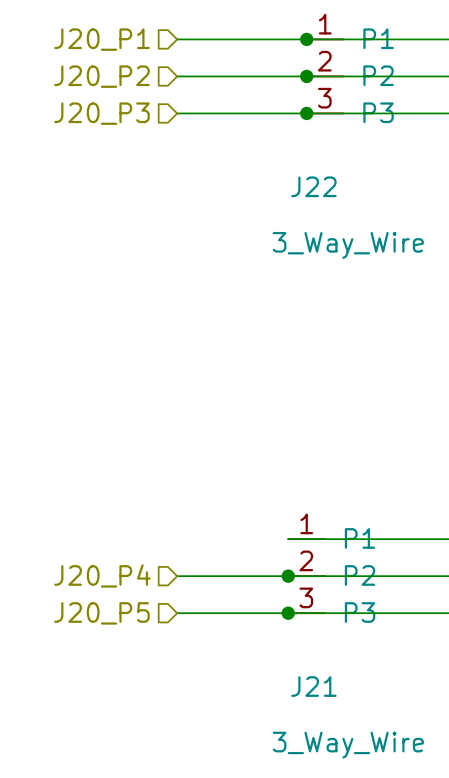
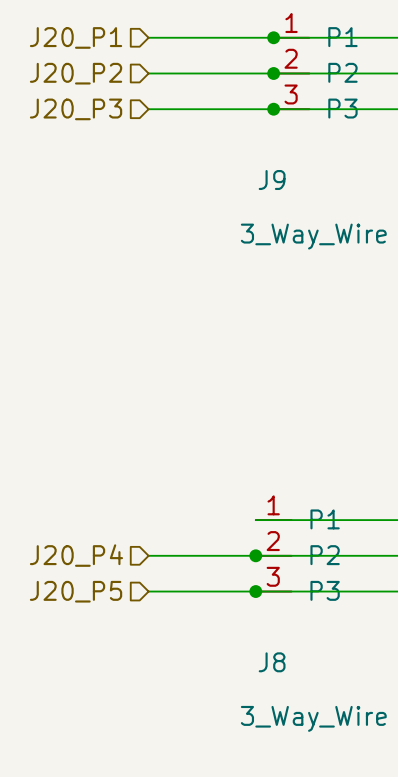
J22 name: J22 (313, 186) -> J9 (272, 180)
J21 name: J21 (313, 686) -> J8 (272, 662)

